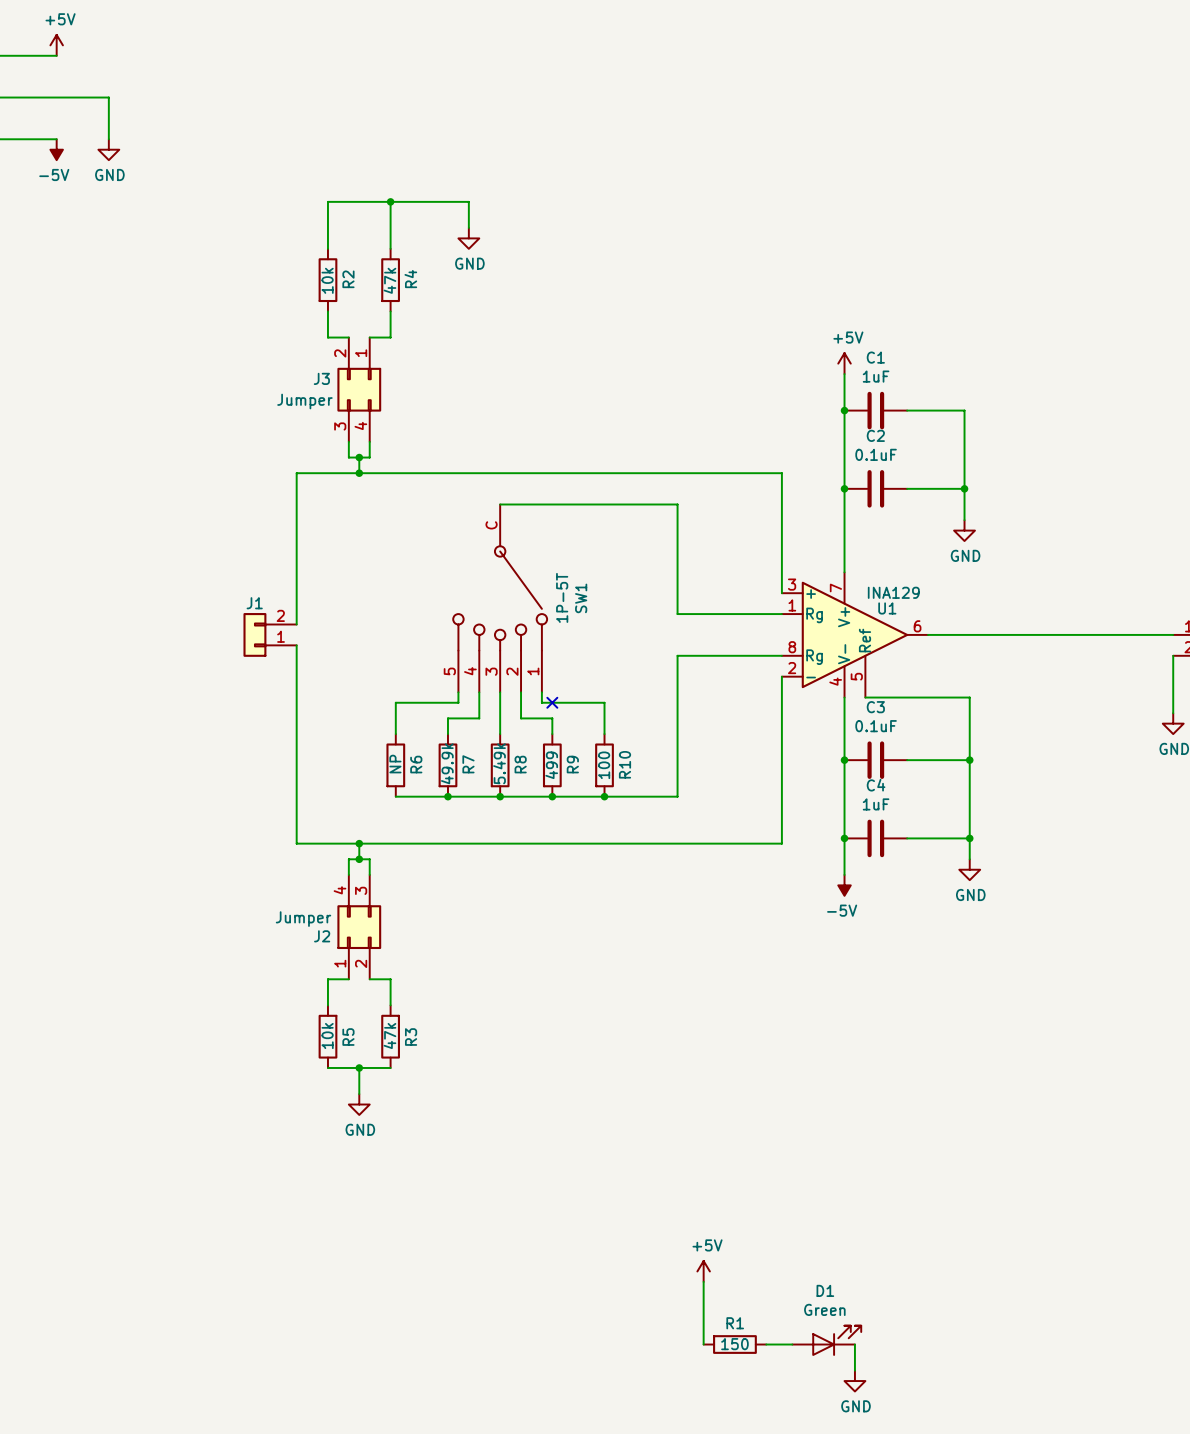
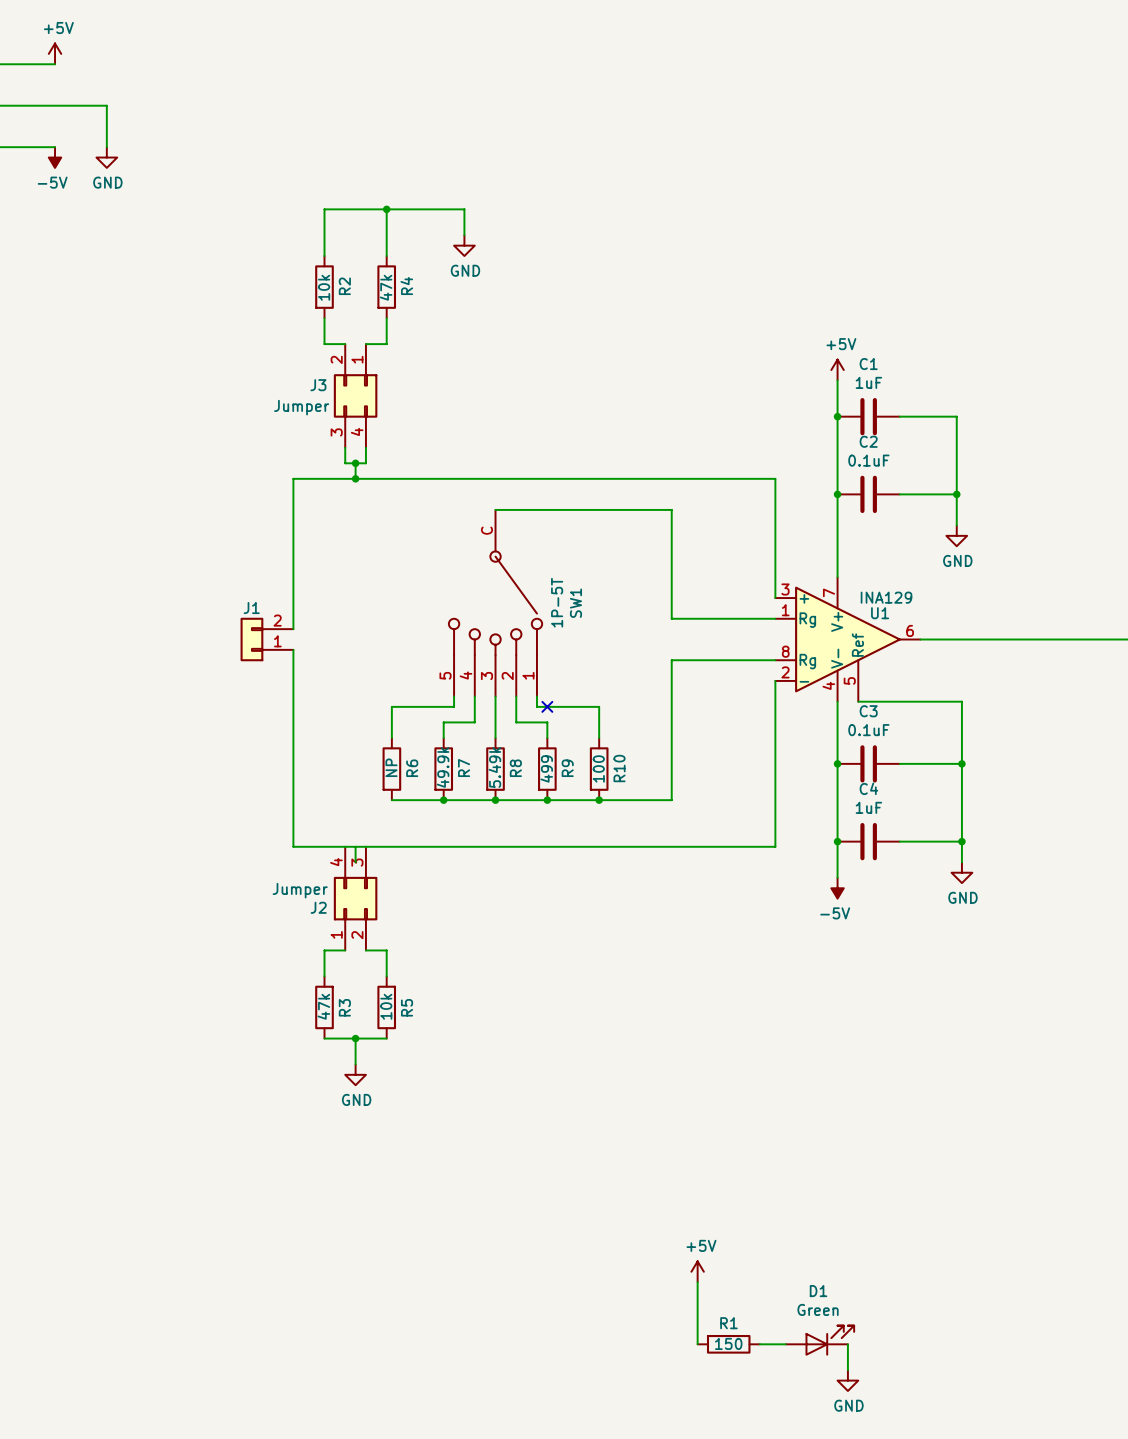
junction: (359, 843) -> none
junction: (359, 859) -> none
J2 position: (359, 927) -> (355, 898)
wire: (348, 979) (327, 979) (327, 1005) -> (345, 950) (324, 950) (324, 976)
wire: (369, 979) (390, 979) (390, 1005) -> (365, 950) (386, 950) (386, 976)
R5 position: (327, 1036) -> (386, 1007)
R3 position: (390, 1036) -> (324, 1007)
wire: (327, 1067) (390, 1067) -> (324, 1038) (386, 1038)
wire: (359, 1067) (359, 1094) -> (355, 1038) (355, 1064)
junction position: (359, 1067) -> (355, 1038)
power symbol position: GND (359, 1104) -> GND (355, 1074)

